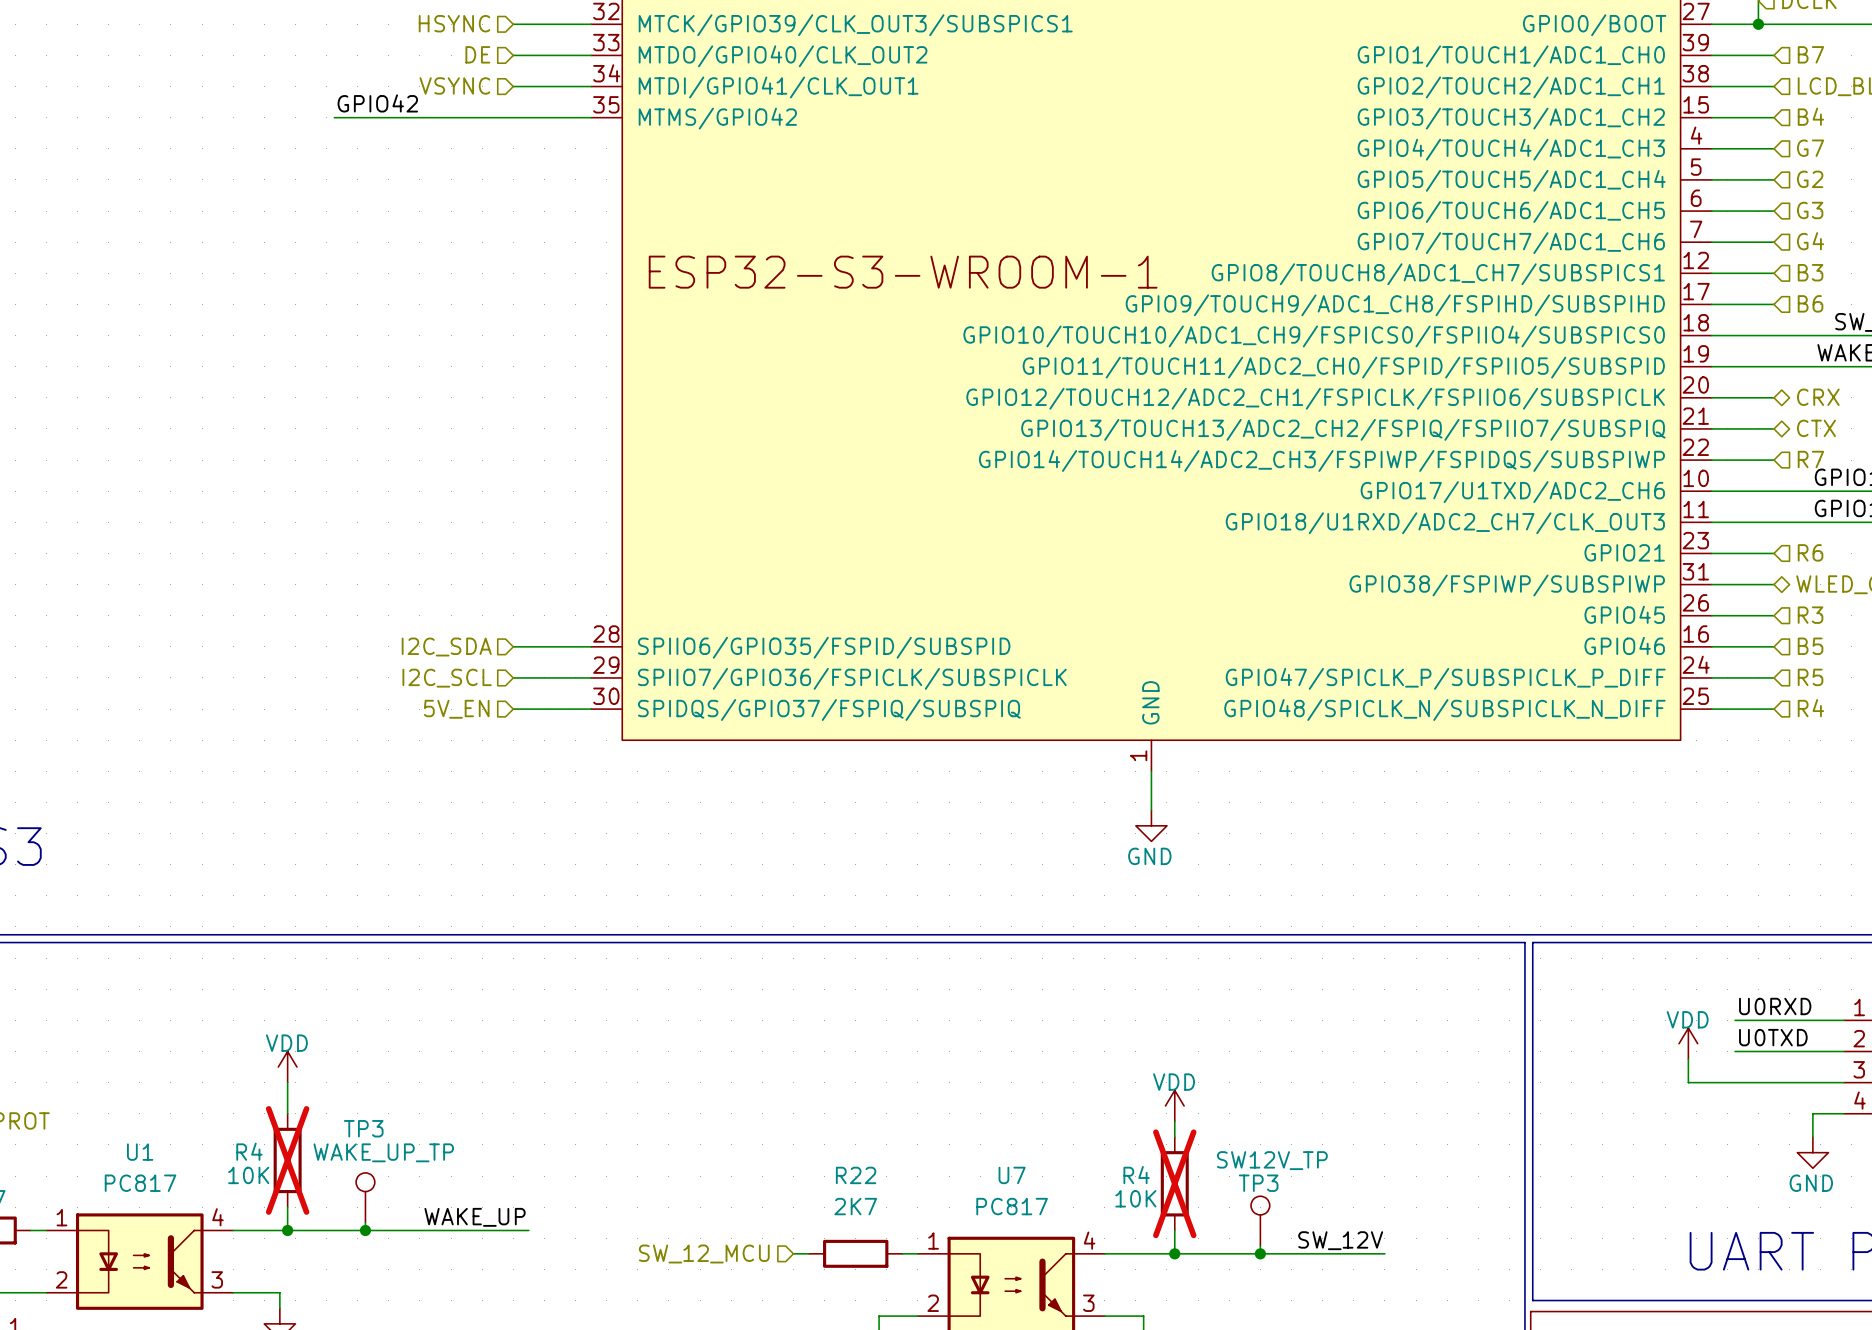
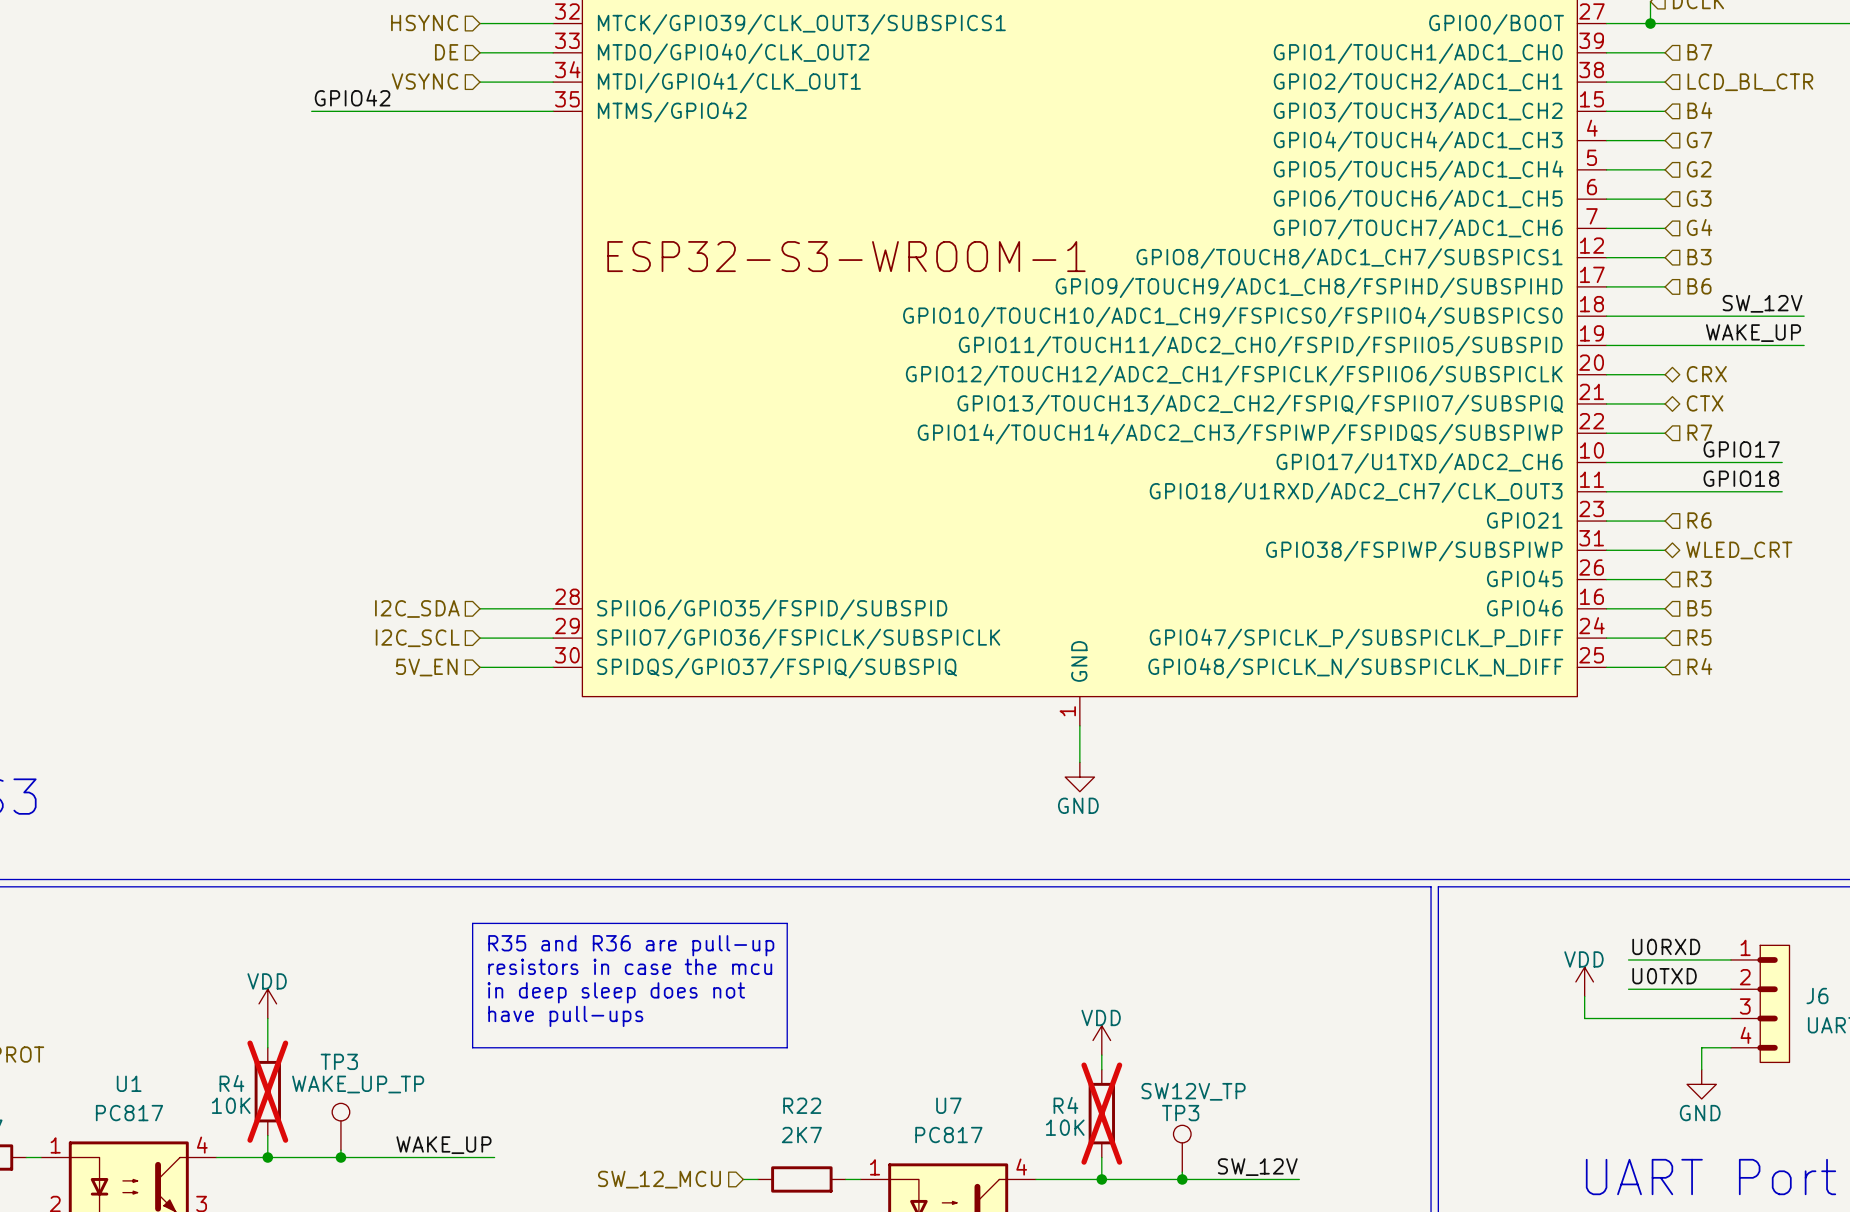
line: none -> (472, 923) (787, 923) (787, 1047) (472, 1047) (472, 923)
text: none -> R35 and R36 are pull-up (631, 945)
text: none -> resistors in case the mcu (630, 966)
text: none -> in deep sleep does not (616, 992)
text: none -> have pull-ups (565, 1016)

